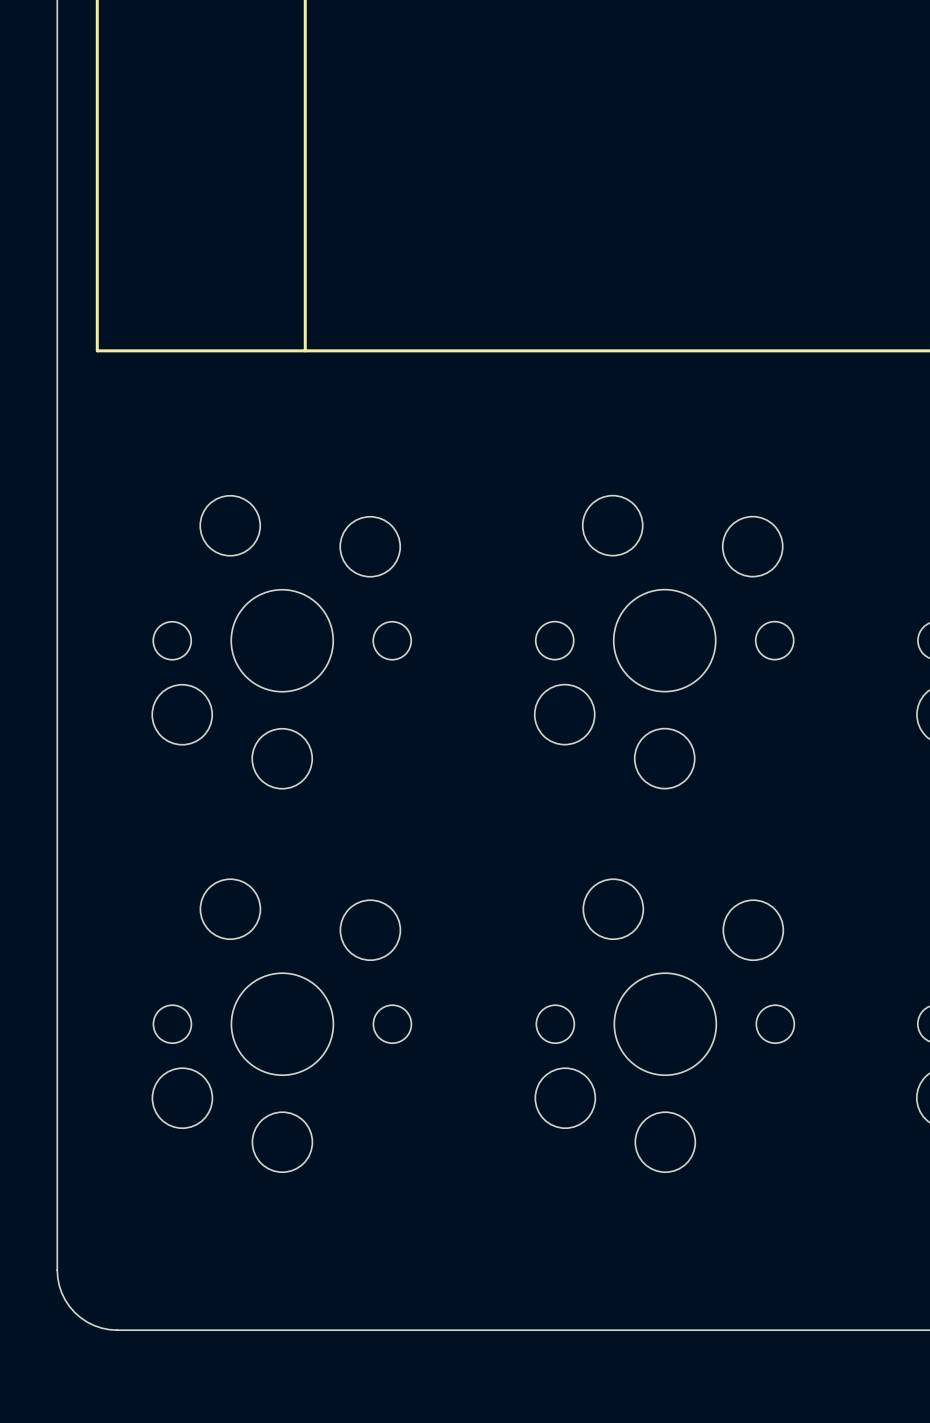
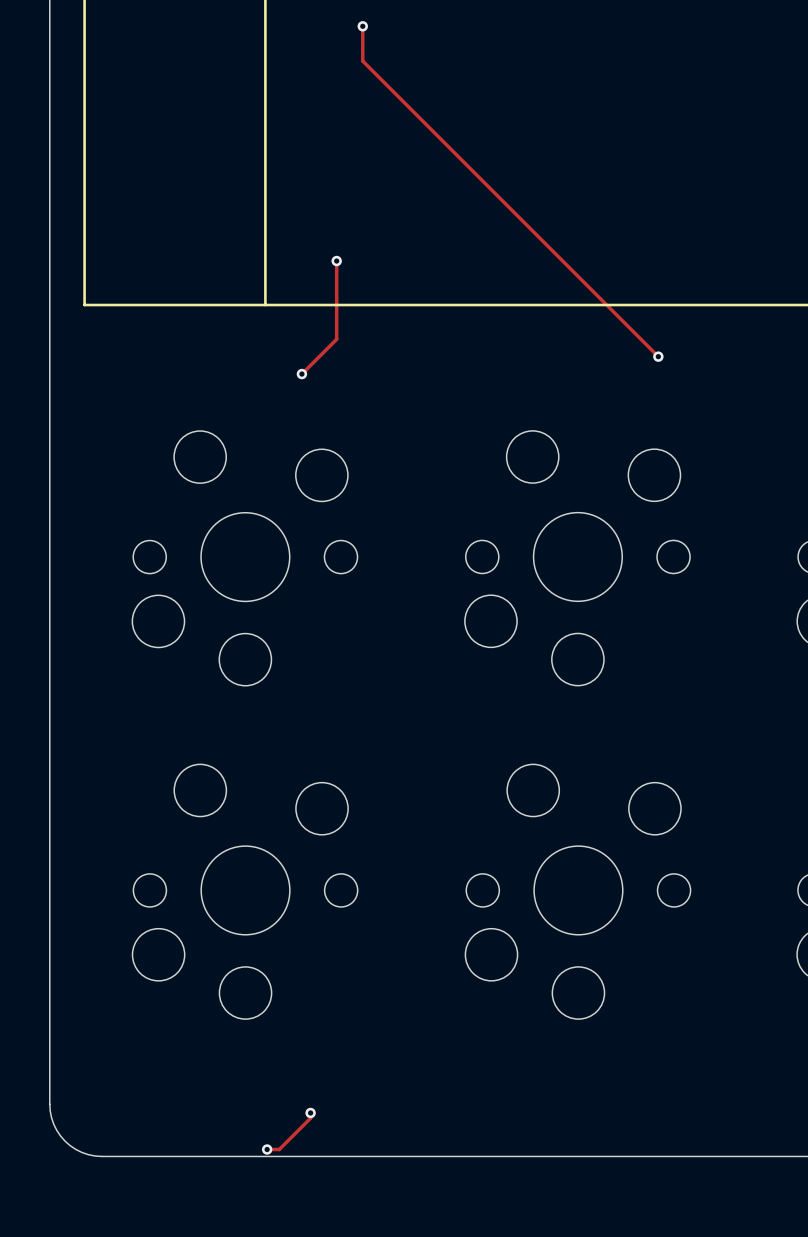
track: none -> (362, 26) (362, 61) (658, 356)
via: none -> (362, 26)
track: none -> (336, 261) (336, 339) (301, 374)
via: none -> (336, 261)
via: none -> (658, 356)
via: none -> (301, 374)
track: none -> (310, 1112) (310, 1118) (279, 1149) (267, 1149)
via: none -> (310, 1112)
via: none -> (267, 1149)

